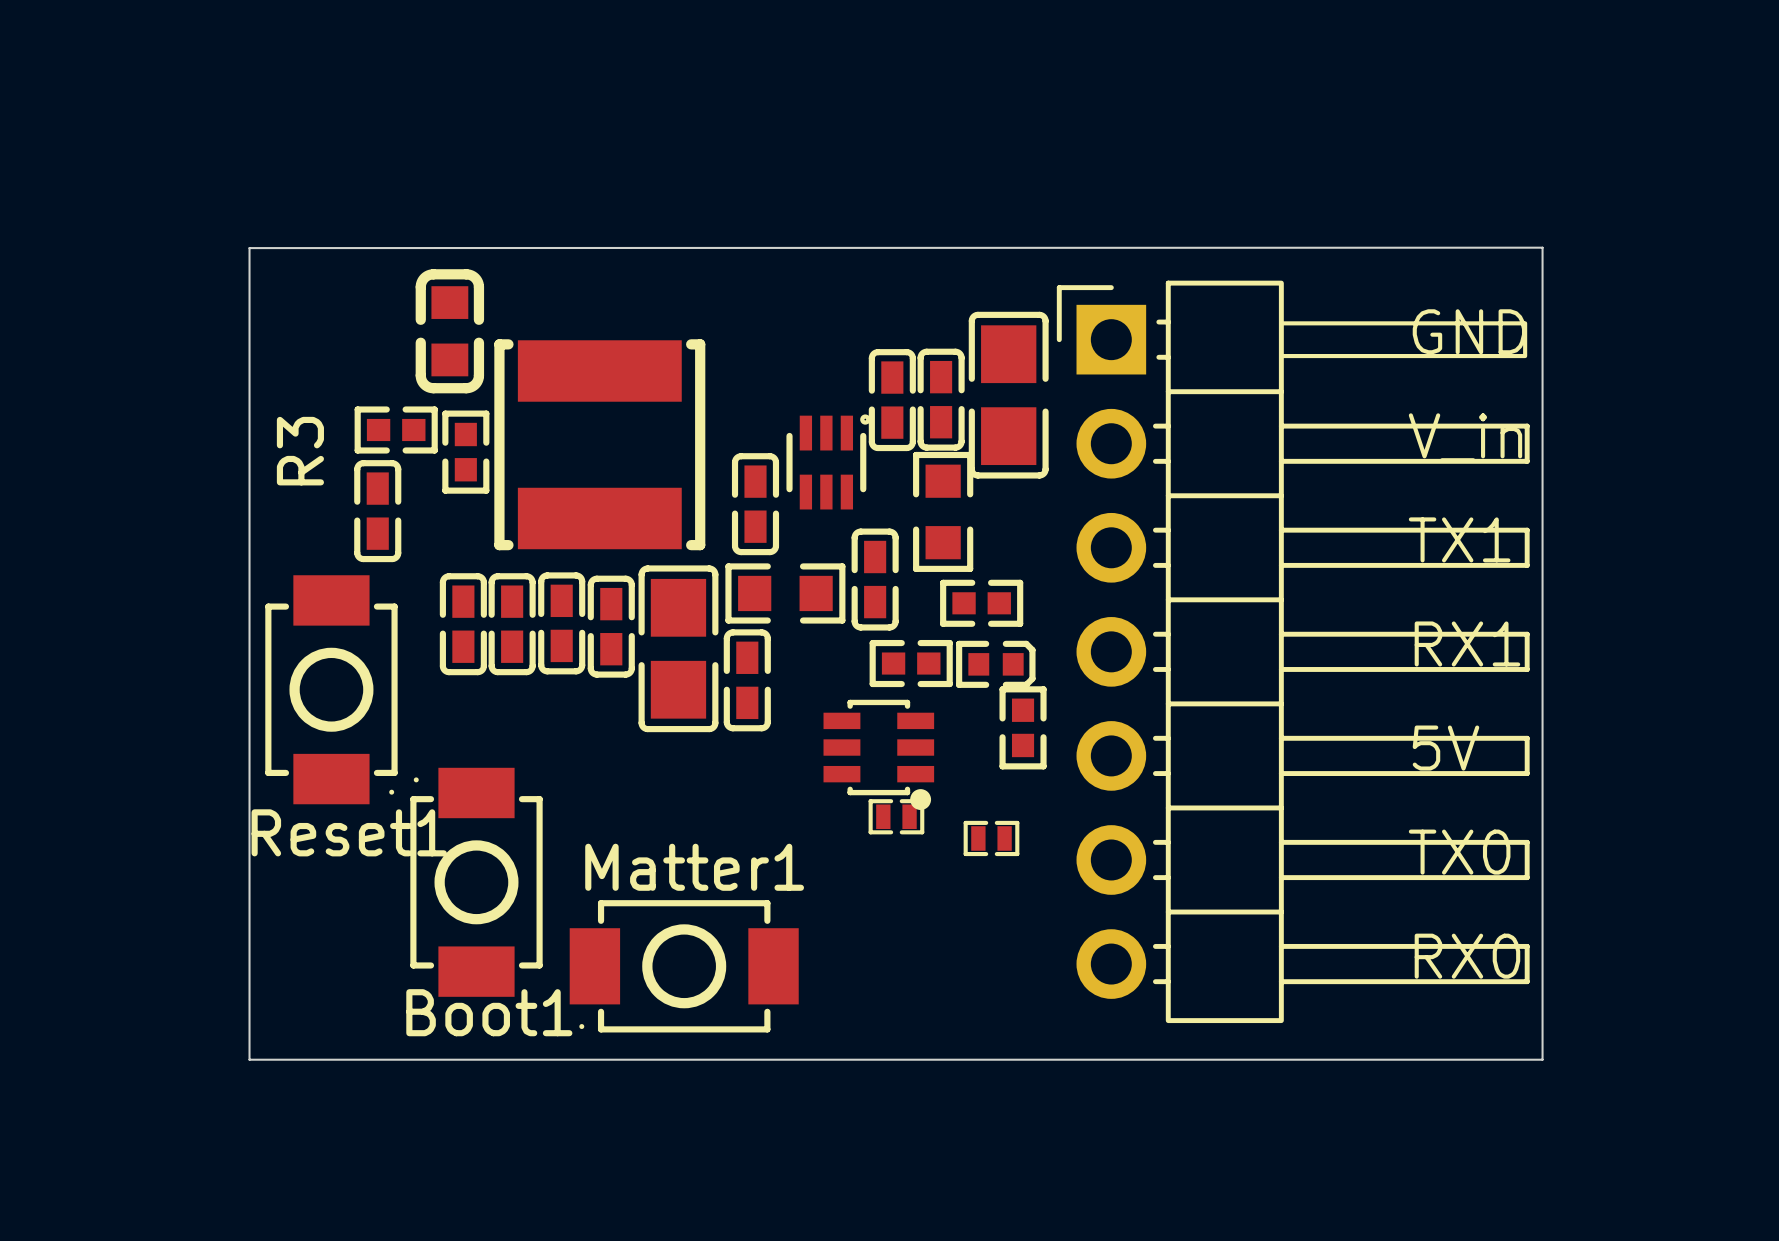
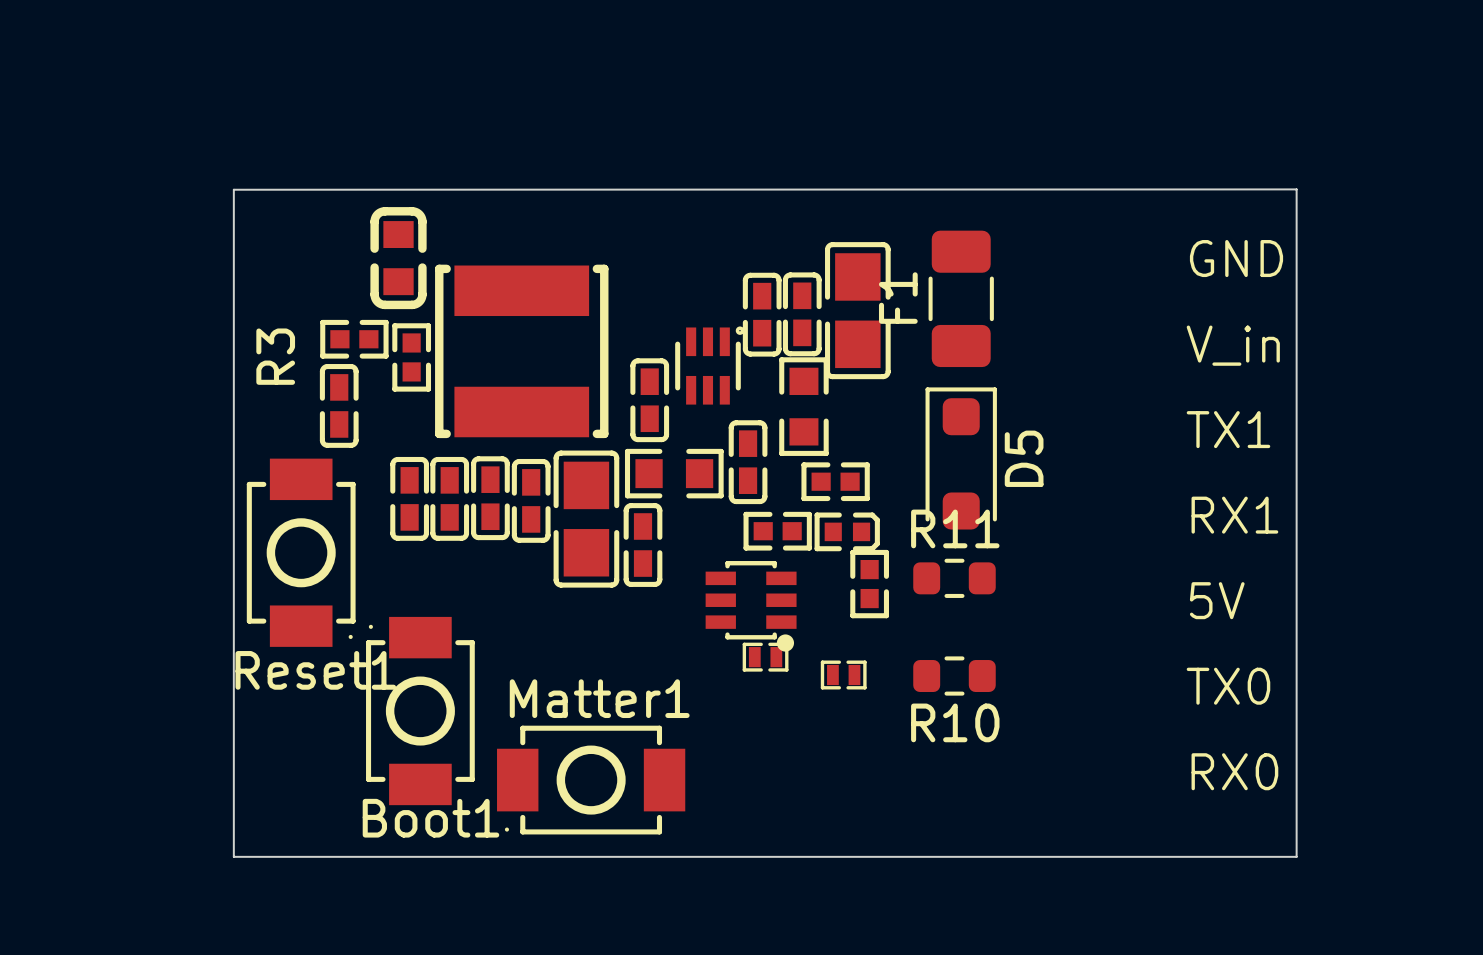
F1: none -> (961, 298)
D5: none -> (961, 458)
part: (1293, 651) -> none
R11: none -> (954, 578)
R10: none -> (954, 676)

